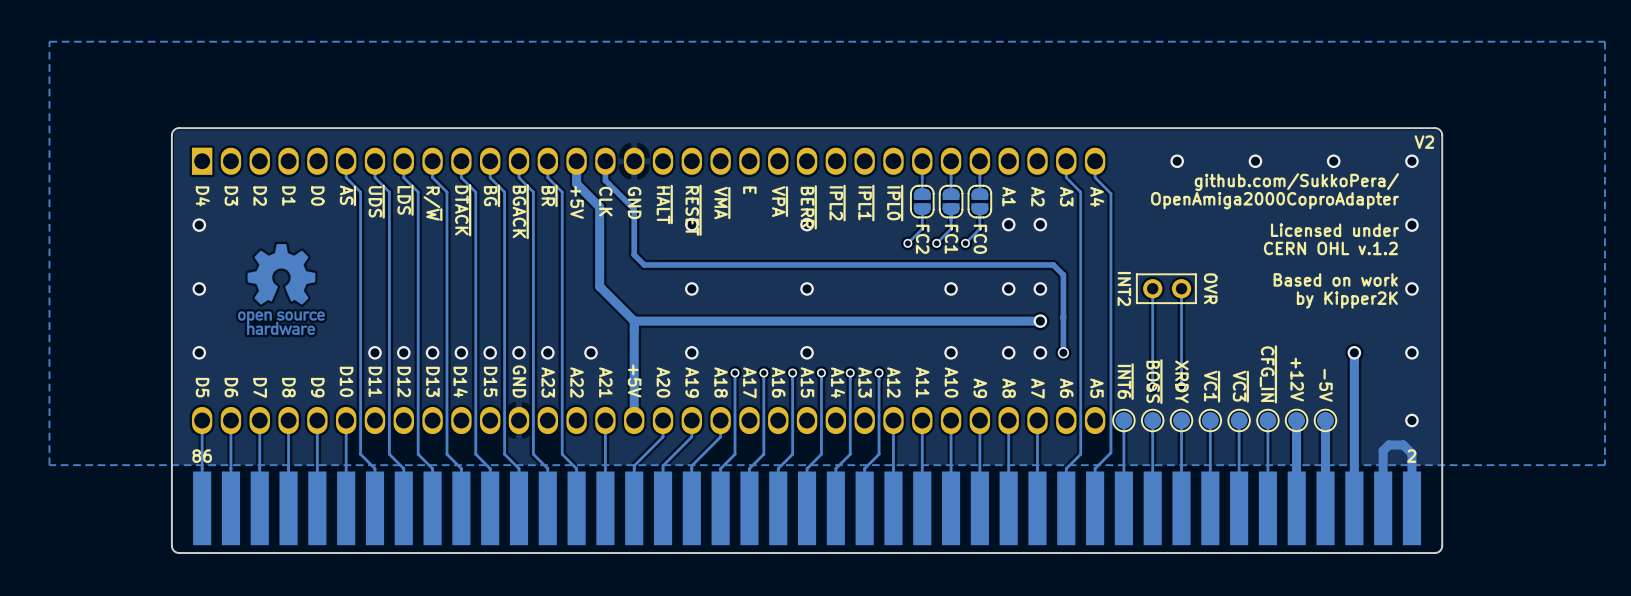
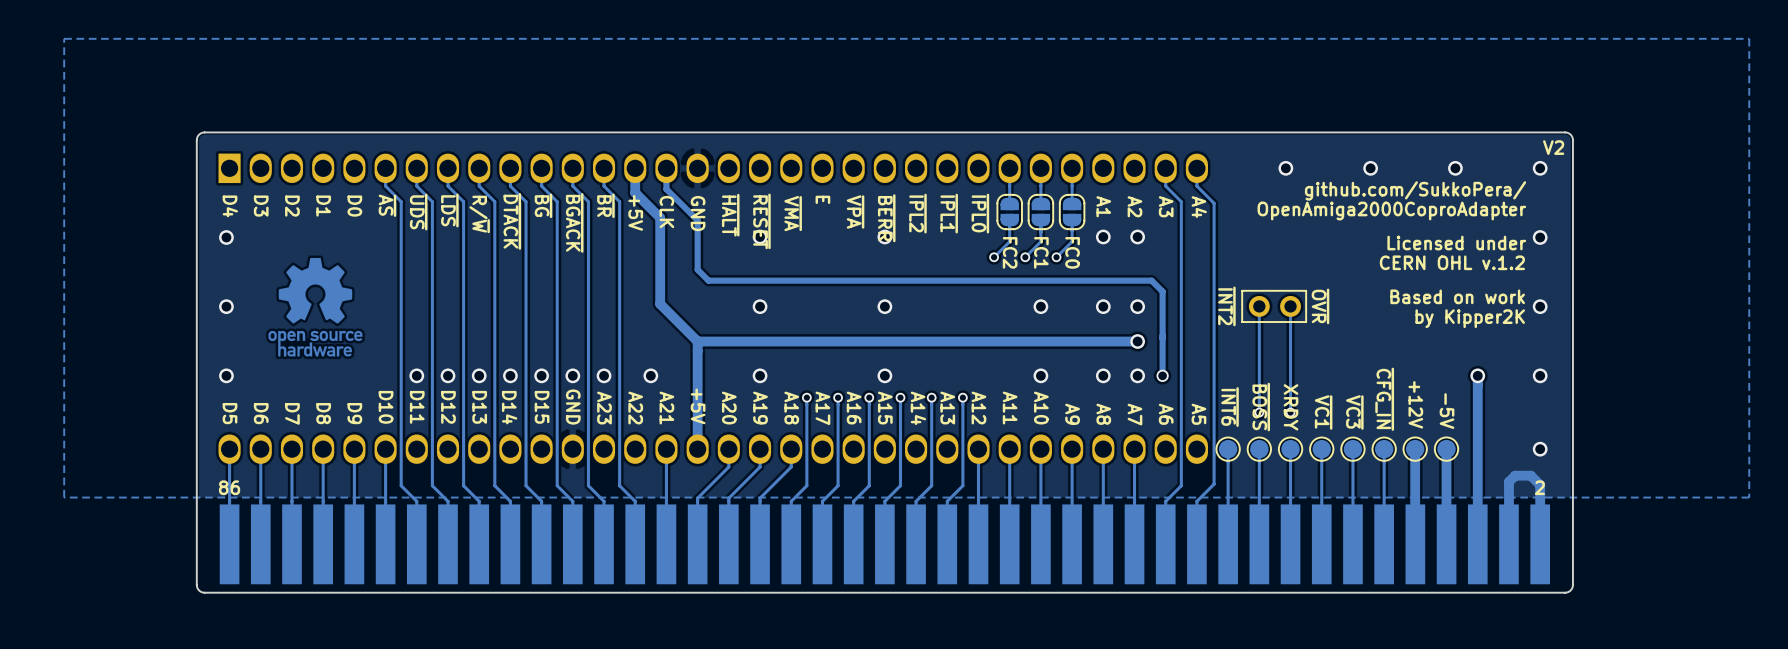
text: INT2 (1124, 288) -> ~{INT2} (1226, 306)
text: OVR (1210, 288) -> ~{OVR} (1320, 306)

